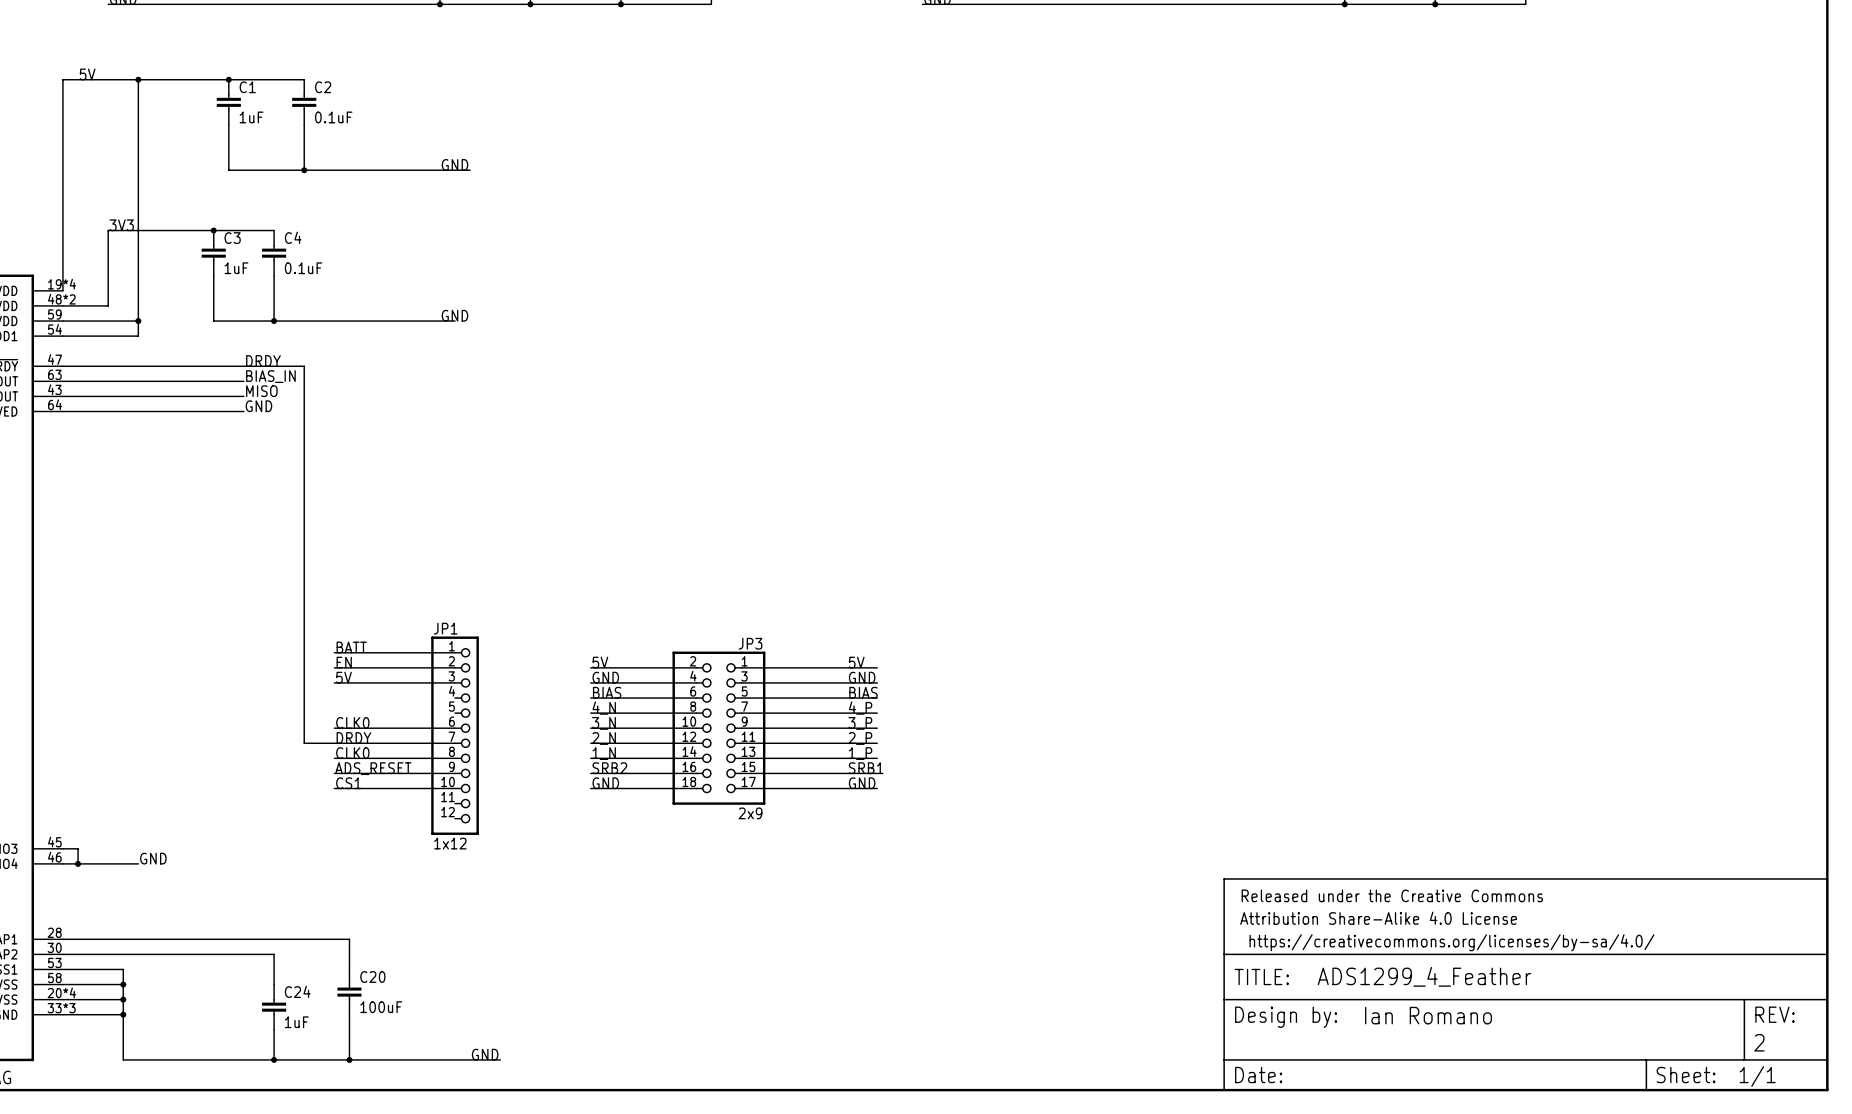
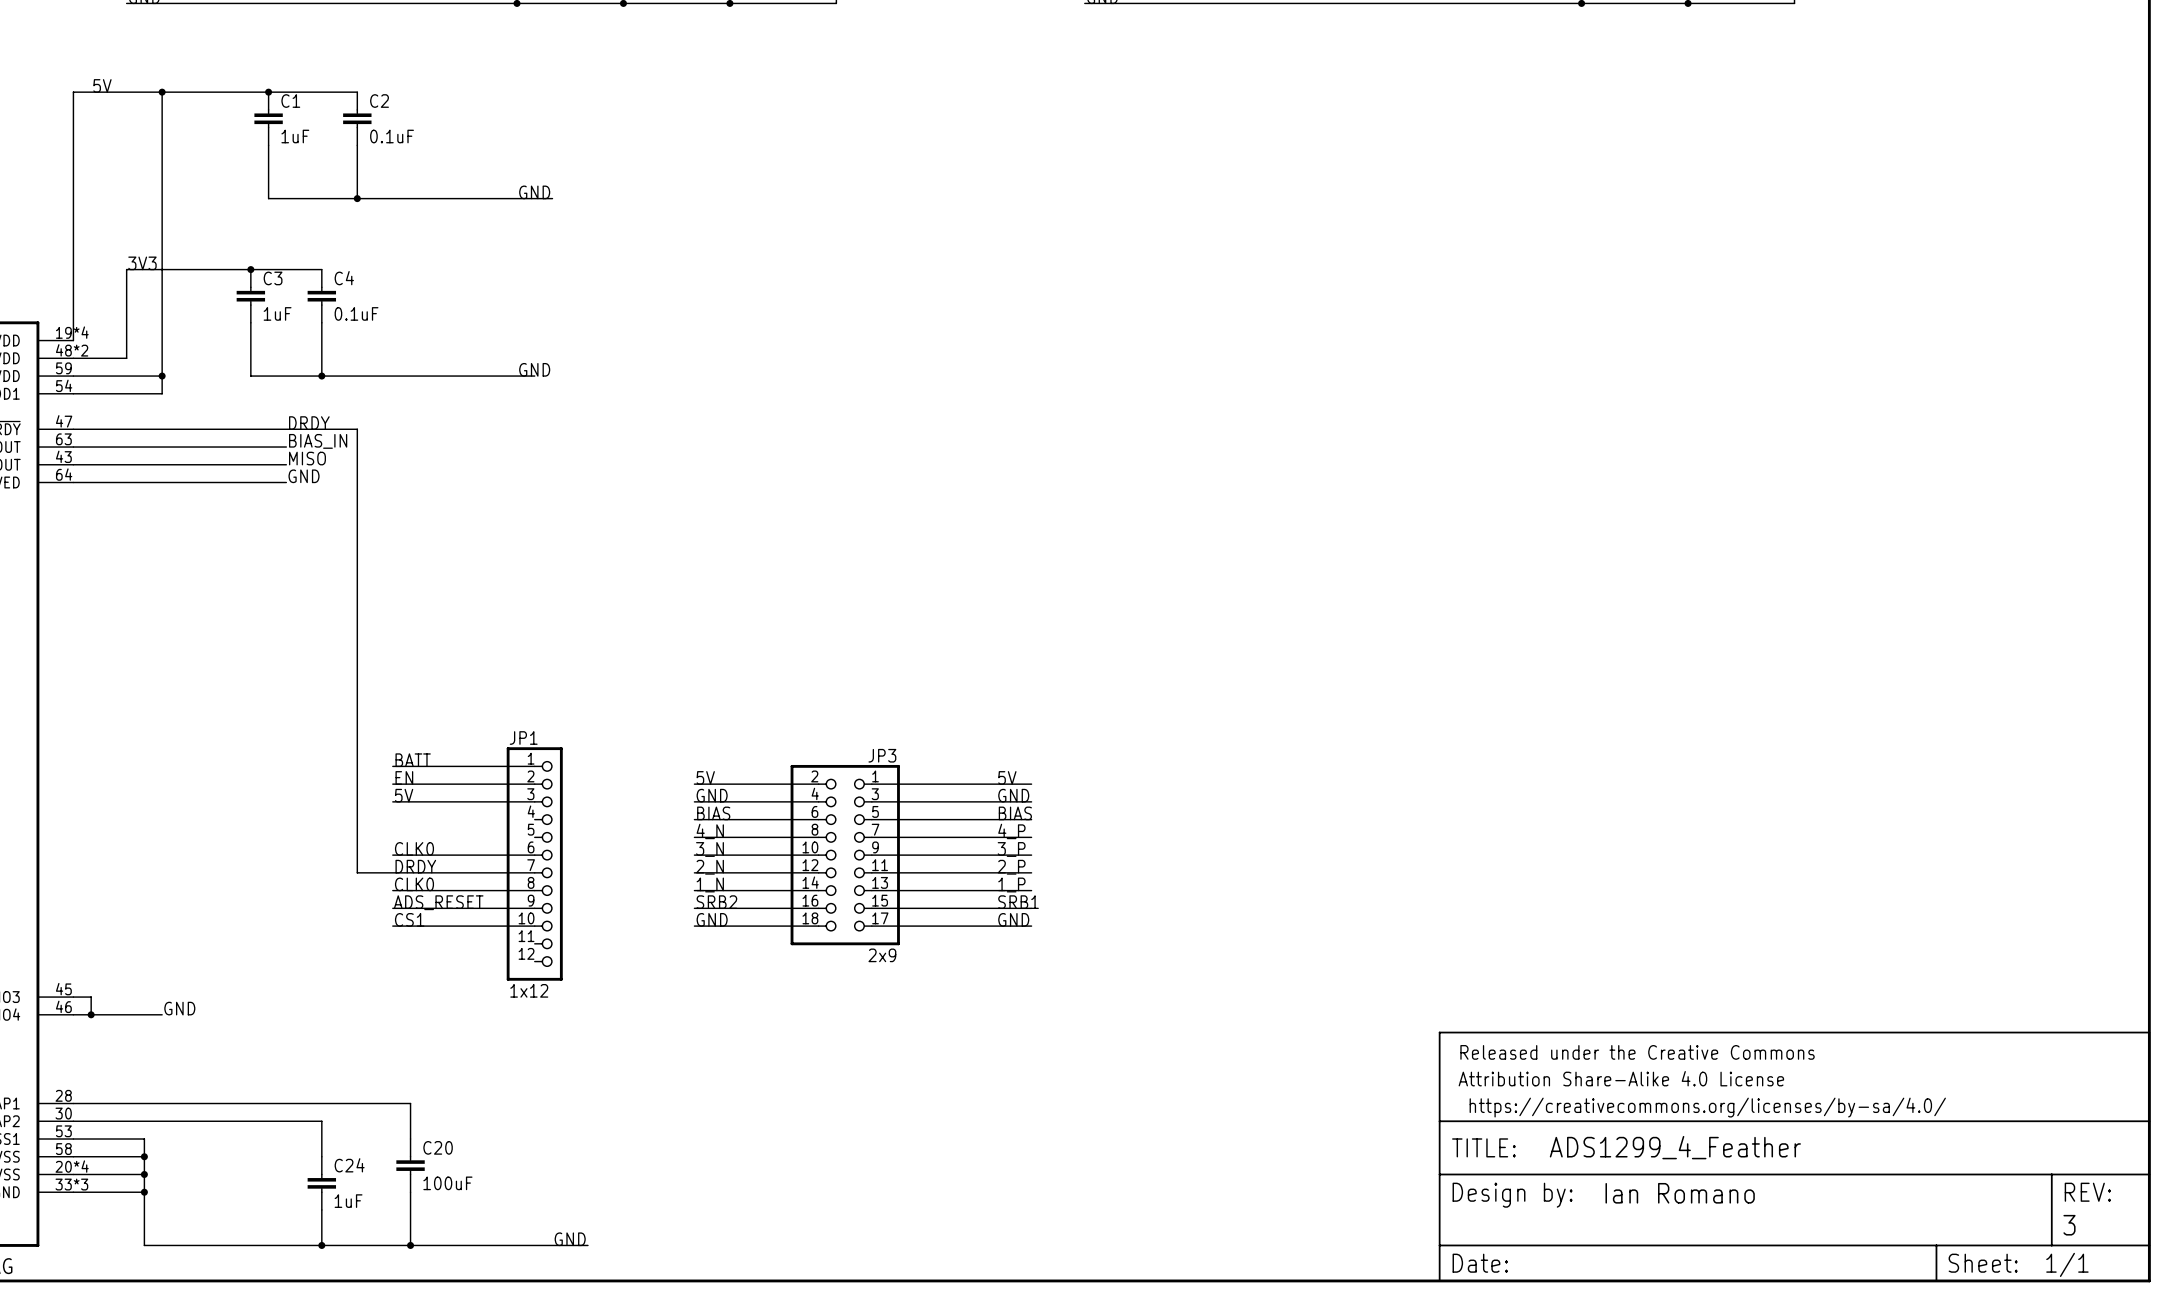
part text: 2 (1759, 1042) -> 3 (2069, 1225)

